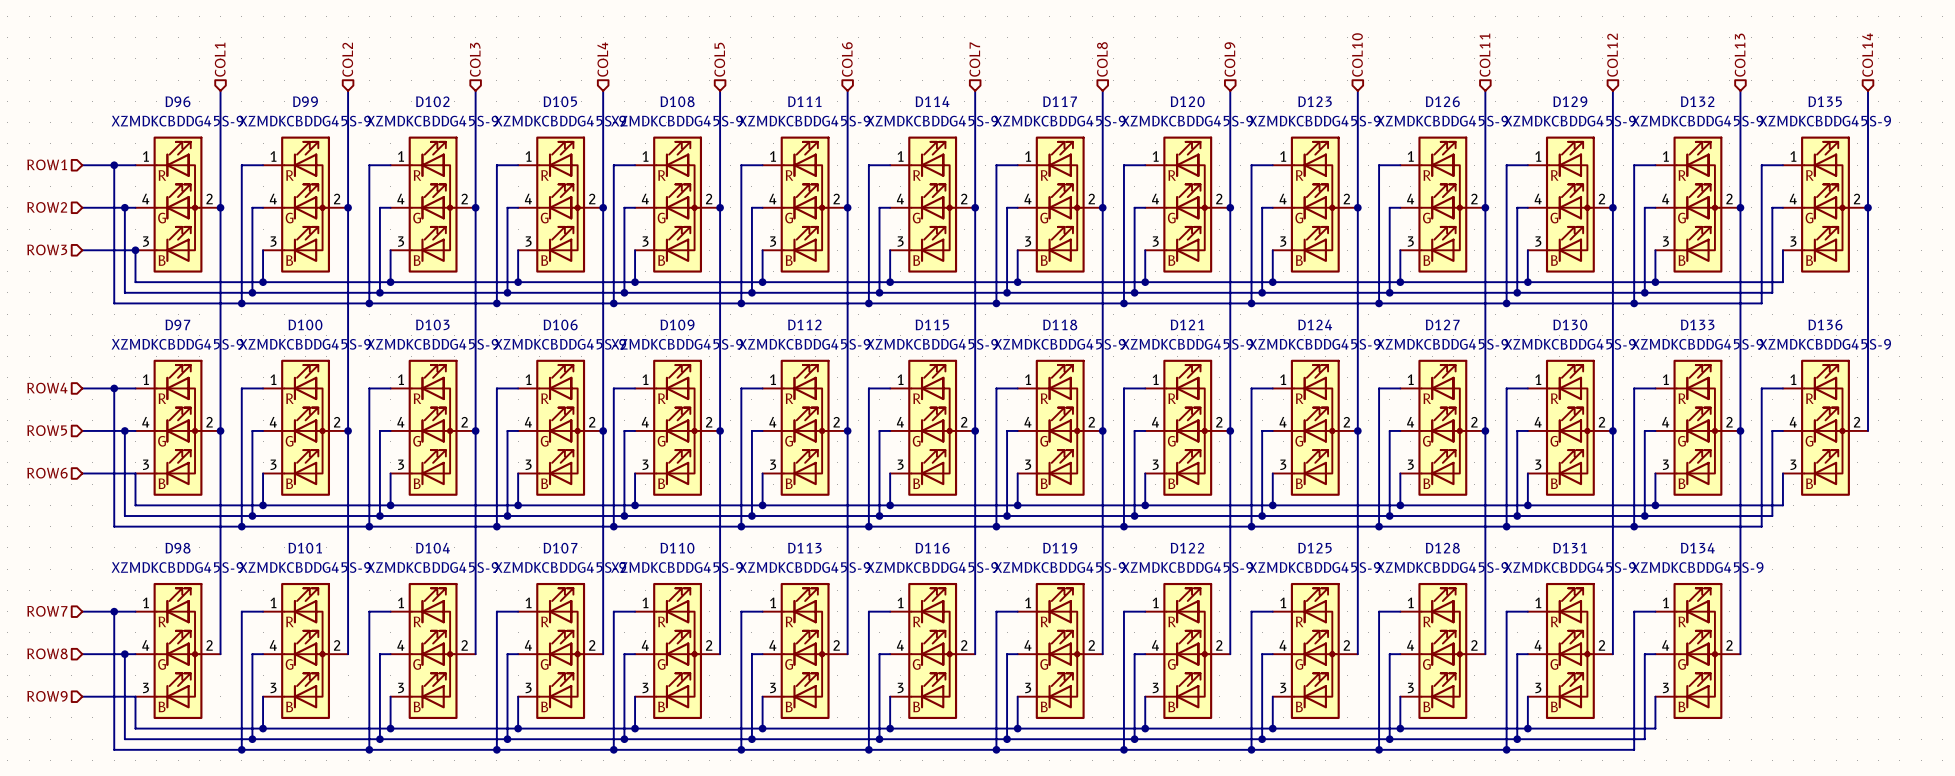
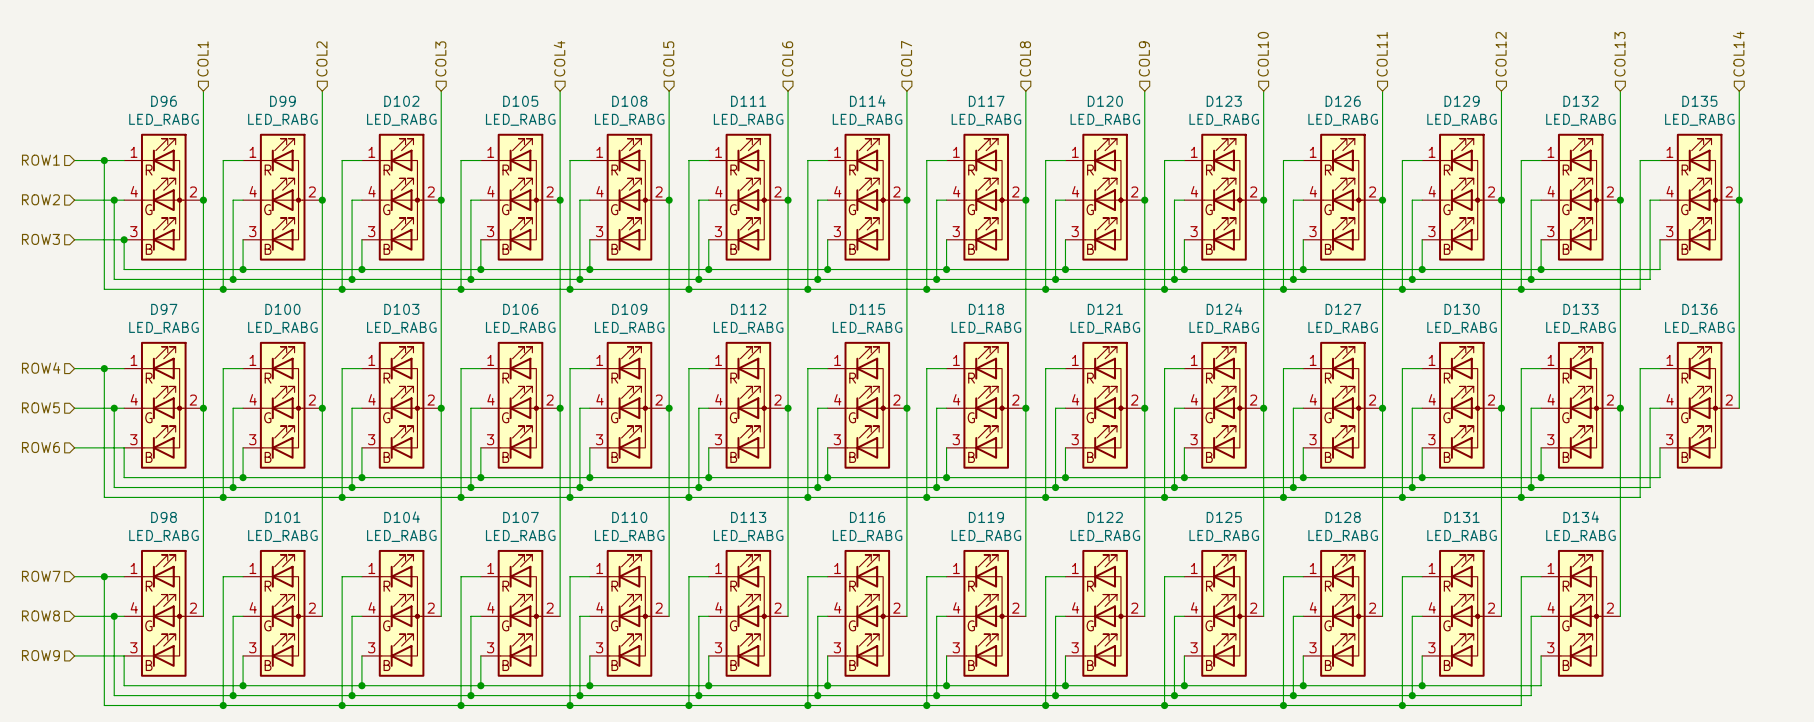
D96 value: XZMDKCBDDG45S-9 (177, 121) -> LED_RABG (164, 119)
D99 value: XZMDKCBDDG45S-9 (305, 121) -> LED_RABG (282, 119)
D102 value: XZMDKCBDDG45S-9 (432, 121) -> LED_RABG (401, 119)
D105 value: XZMDKCBDDG45S-9 (560, 121) -> LED_RABG (520, 119)
D108 value: XZMDKCBDDG45S-9 (677, 121) -> LED_RABG (629, 119)
D111 value: XZMDKCBDDG45S-9 (804, 121) -> LED_RABG (748, 119)
D114 value: XZMDKCBDDG45S-9 (932, 121) -> LED_RABG (867, 119)
D117 value: XZMDKCBDDG45S-9 (1059, 121) -> LED_RABG (986, 119)
D120 value: XZMDKCBDDG45S-9 (1187, 121) -> LED_RABG (1105, 119)
D123 value: XZMDKCBDDG45S-9 (1314, 121) -> LED_RABG (1224, 119)
D126 value: XZMDKCBDDG45S-9 (1442, 121) -> LED_RABG (1343, 119)
D129 value: XZMDKCBDDG45S-9 (1569, 121) -> LED_RABG (1462, 119)
D132 value: XZMDKCBDDG45S-9 (1697, 121) -> LED_RABG (1580, 119)
D135 value: XZMDKCBDDG45S-9 (1825, 121) -> LED_RABG (1699, 119)
D97 value: XZMDKCBDDG45S-9 (177, 344) -> LED_RABG (164, 327)
D100 value: XZMDKCBDDG45S-9 (305, 344) -> LED_RABG (282, 327)
D103 value: XZMDKCBDDG45S-9 (432, 344) -> LED_RABG (401, 327)
D106 value: XZMDKCBDDG45S-9 (560, 344) -> LED_RABG (520, 327)
D109 value: XZMDKCBDDG45S-9 (677, 344) -> LED_RABG (629, 327)
D112 value: XZMDKCBDDG45S-9 (804, 344) -> LED_RABG (748, 327)
D115 value: XZMDKCBDDG45S-9 (932, 344) -> LED_RABG (867, 327)
D118 value: XZMDKCBDDG45S-9 (1059, 344) -> LED_RABG (986, 327)
D121 value: XZMDKCBDDG45S-9 (1187, 344) -> LED_RABG (1105, 327)
D124 value: XZMDKCBDDG45S-9 (1314, 344) -> LED_RABG (1224, 327)
D127 value: XZMDKCBDDG45S-9 (1442, 344) -> LED_RABG (1343, 327)
D130 value: XZMDKCBDDG45S-9 (1569, 344) -> LED_RABG (1462, 327)
D133 value: XZMDKCBDDG45S-9 (1697, 344) -> LED_RABG (1580, 327)
D136 value: XZMDKCBDDG45S-9 (1825, 344) -> LED_RABG (1699, 327)
D98 value: XZMDKCBDDG45S-9 (177, 567) -> LED_RABG (164, 535)
D101 value: XZMDKCBDDG45S-9 (305, 567) -> LED_RABG (282, 535)
D104 value: XZMDKCBDDG45S-9 (432, 567) -> LED_RABG (401, 535)
D107 value: XZMDKCBDDG45S-9 (560, 567) -> LED_RABG (520, 535)
D110 value: XZMDKCBDDG45S-9 (677, 567) -> LED_RABG (629, 535)
D113 value: XZMDKCBDDG45S-9 (804, 567) -> LED_RABG (748, 535)
D116 value: XZMDKCBDDG45S-9 (932, 567) -> LED_RABG (867, 535)
D119 value: XZMDKCBDDG45S-9 (1059, 567) -> LED_RABG (986, 535)
D122 value: XZMDKCBDDG45S-9 (1187, 567) -> LED_RABG (1105, 535)
D125 value: XZMDKCBDDG45S-9 (1314, 567) -> LED_RABG (1224, 535)
D128 value: XZMDKCBDDG45S-9 (1442, 567) -> LED_RABG (1343, 535)
D131 value: XZMDKCBDDG45S-9 (1569, 567) -> LED_RABG (1462, 535)
D134 value: XZMDKCBDDG45S-9 (1697, 567) -> LED_RABG (1580, 535)

